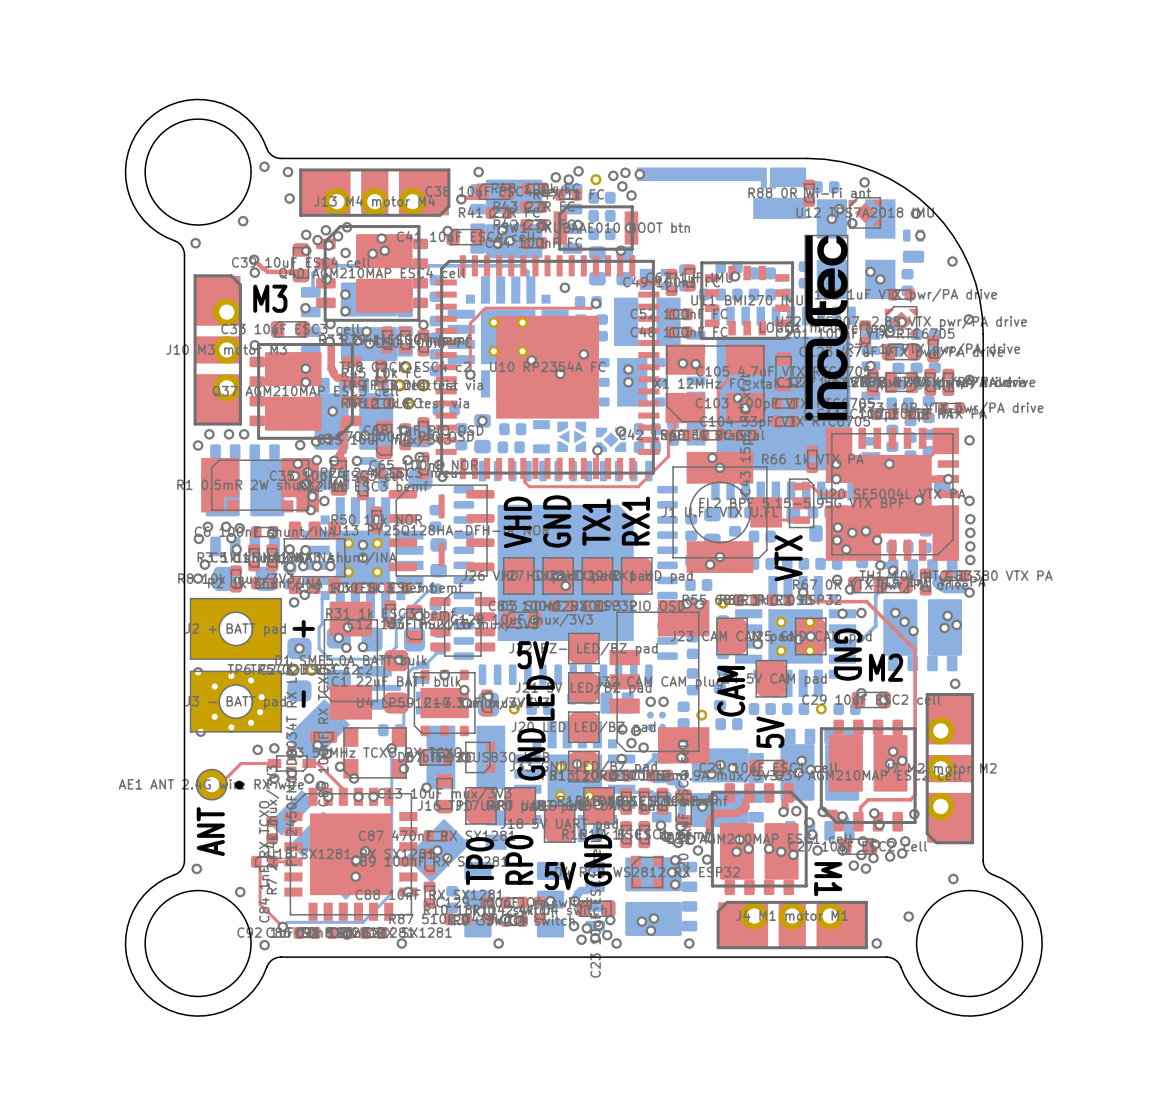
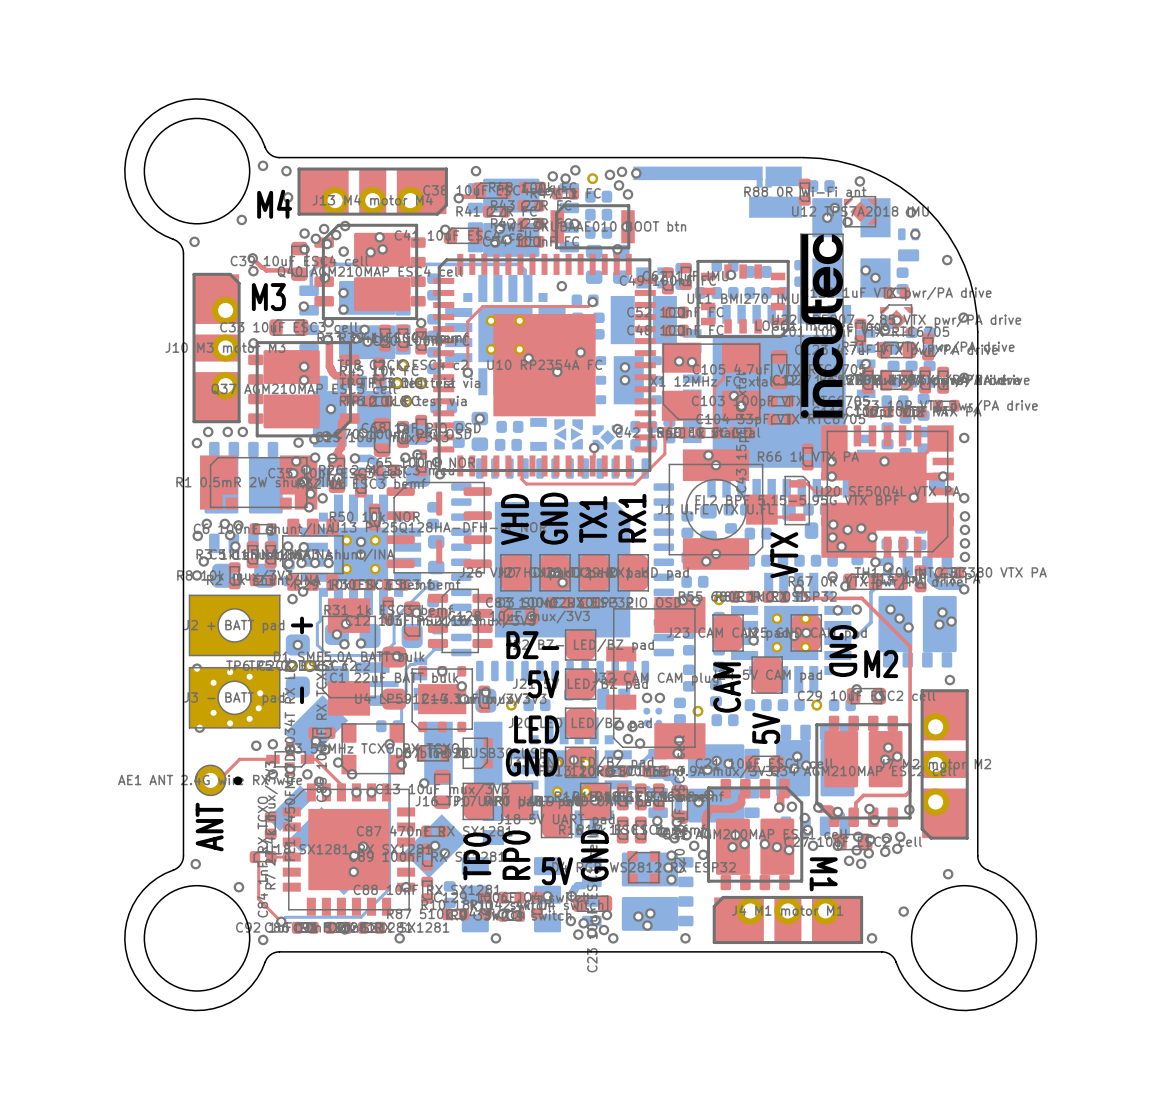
text: none -> M4 (274, 204)
text: none -> BZ- (532, 645)
text position: 5V (533, 655) -> 5V (543, 684)
text rotation: 0° (540, 698) -> 90° clockwise (536, 729)
text rotation: 0° (531, 754) -> 90° clockwise (531, 762)

